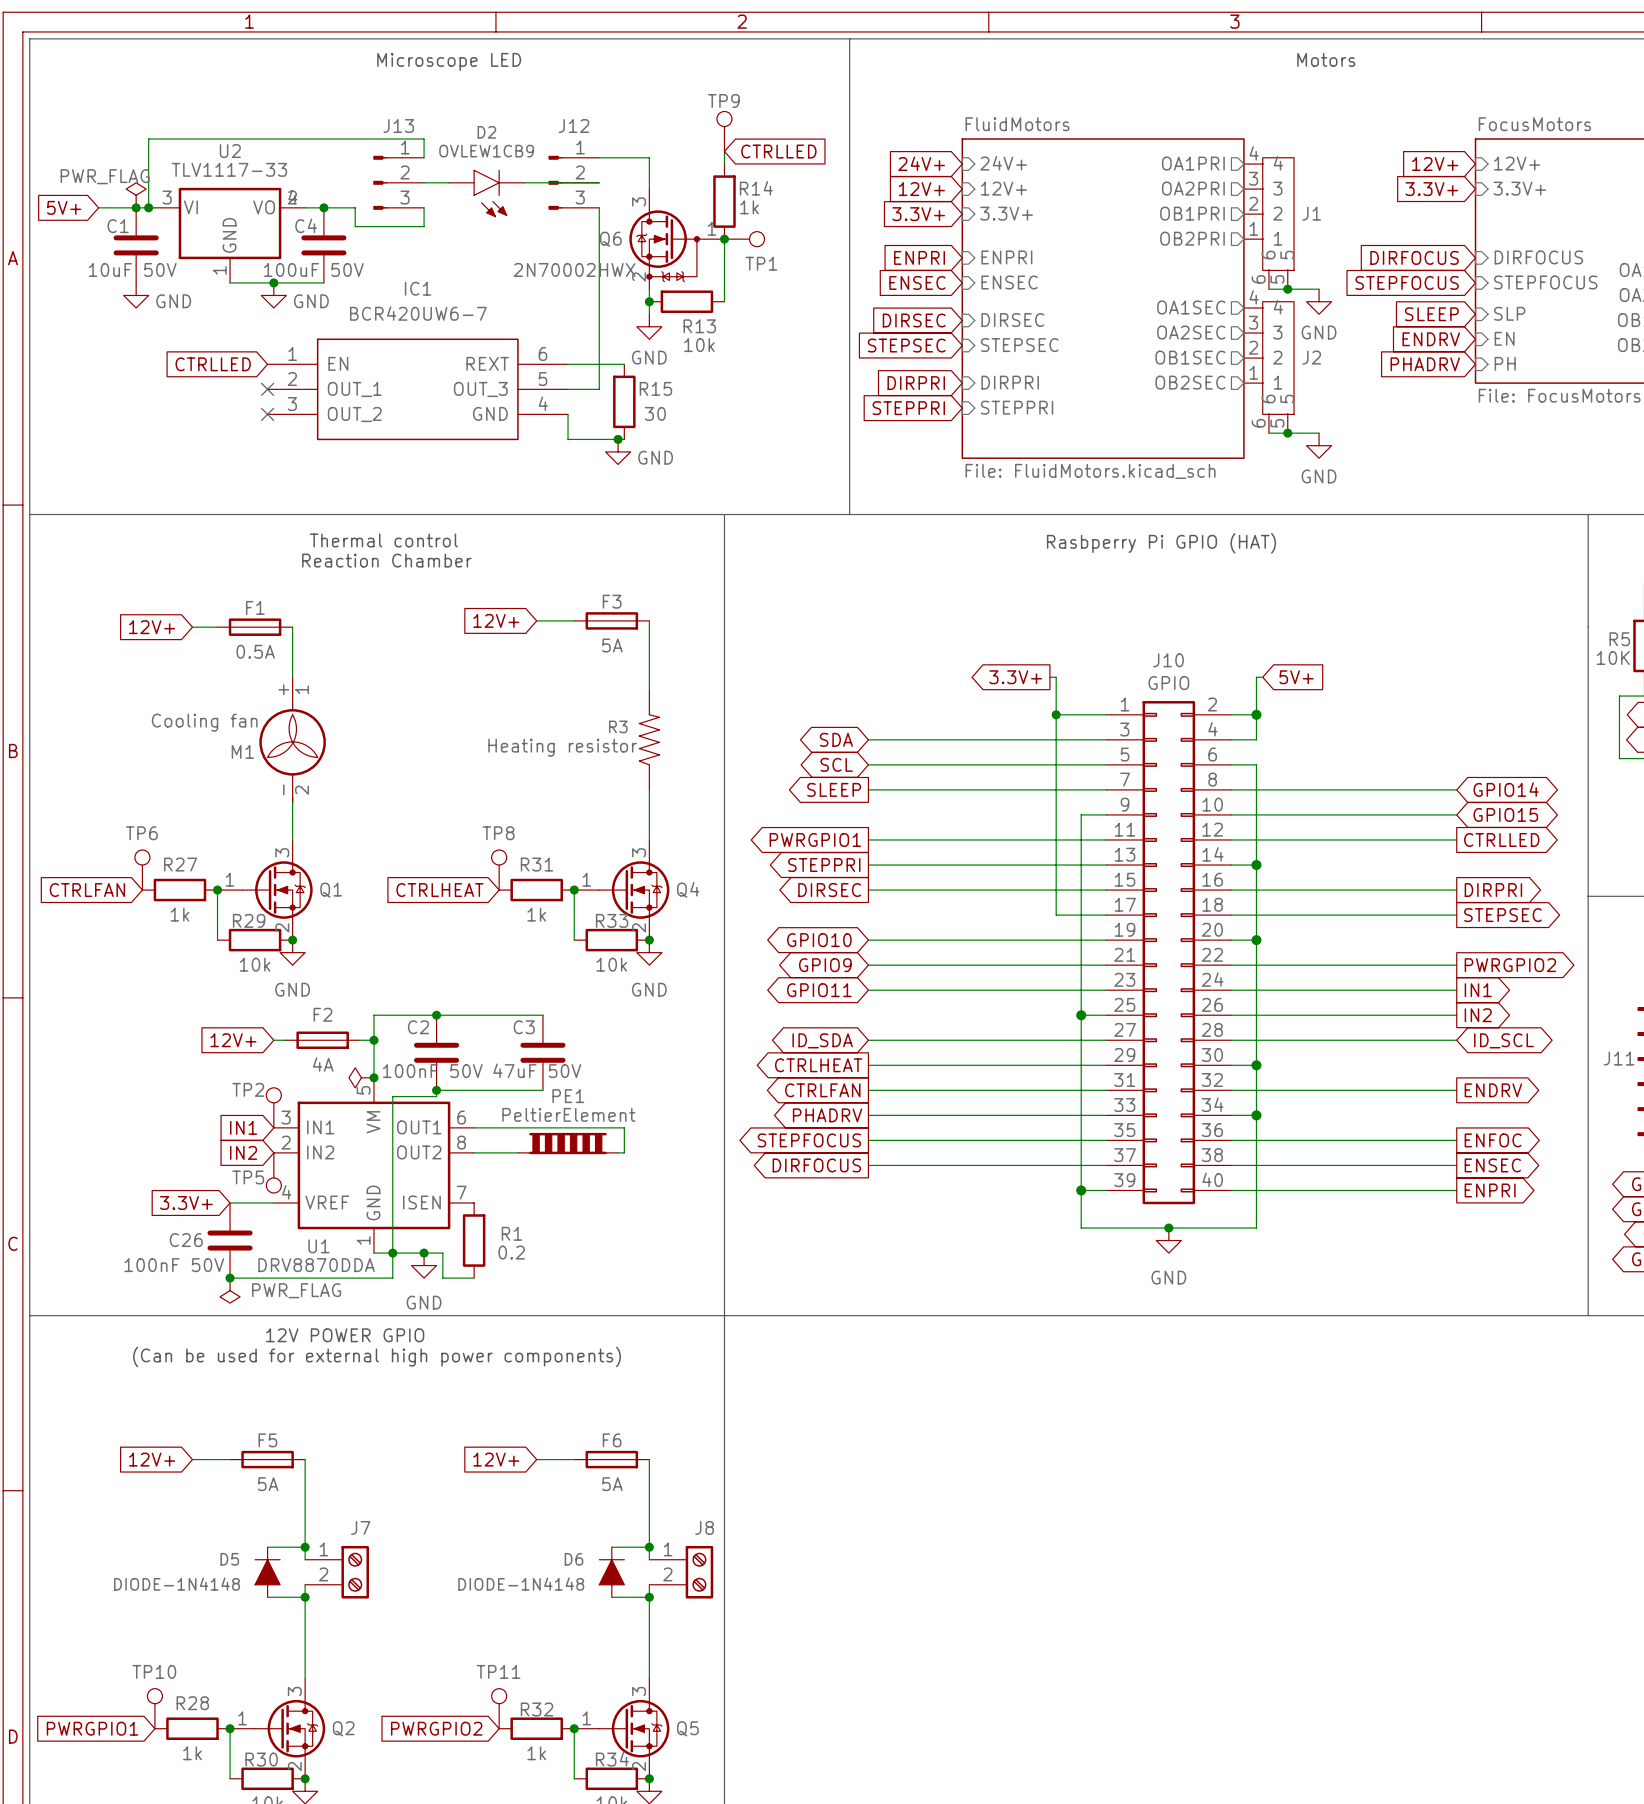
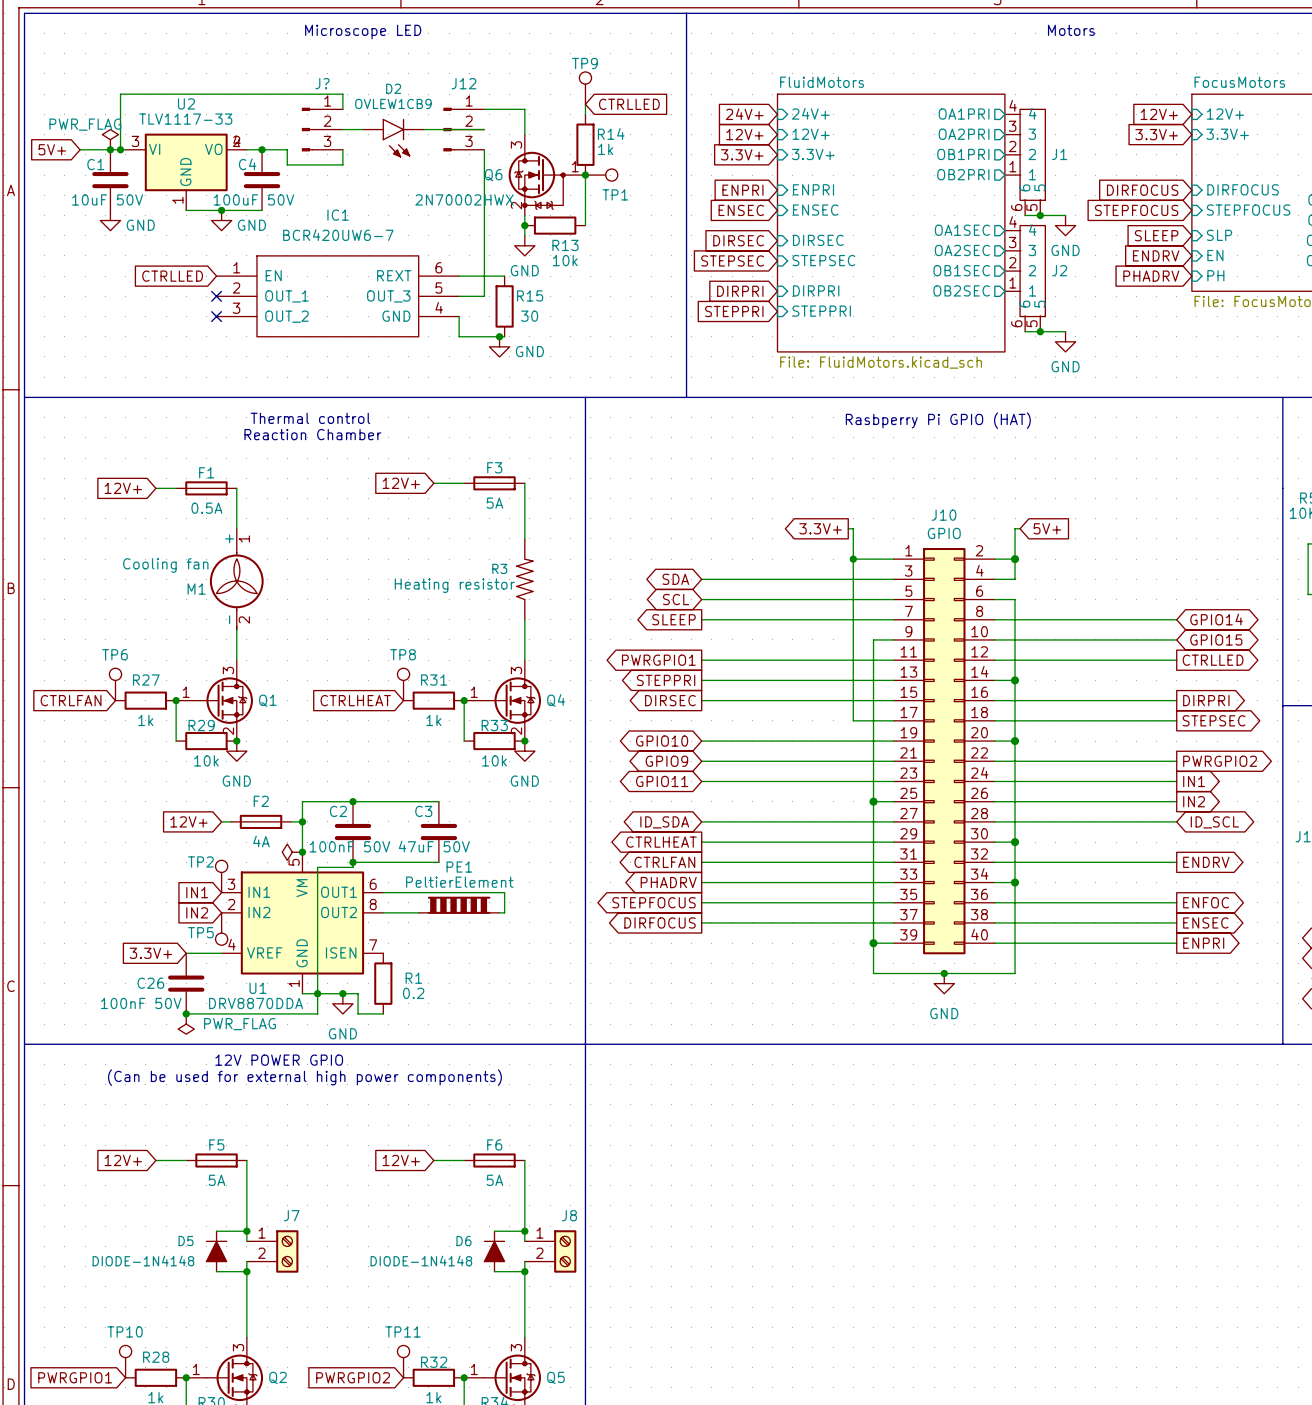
J13 name: J13 (398, 126) -> J? (322, 83)

